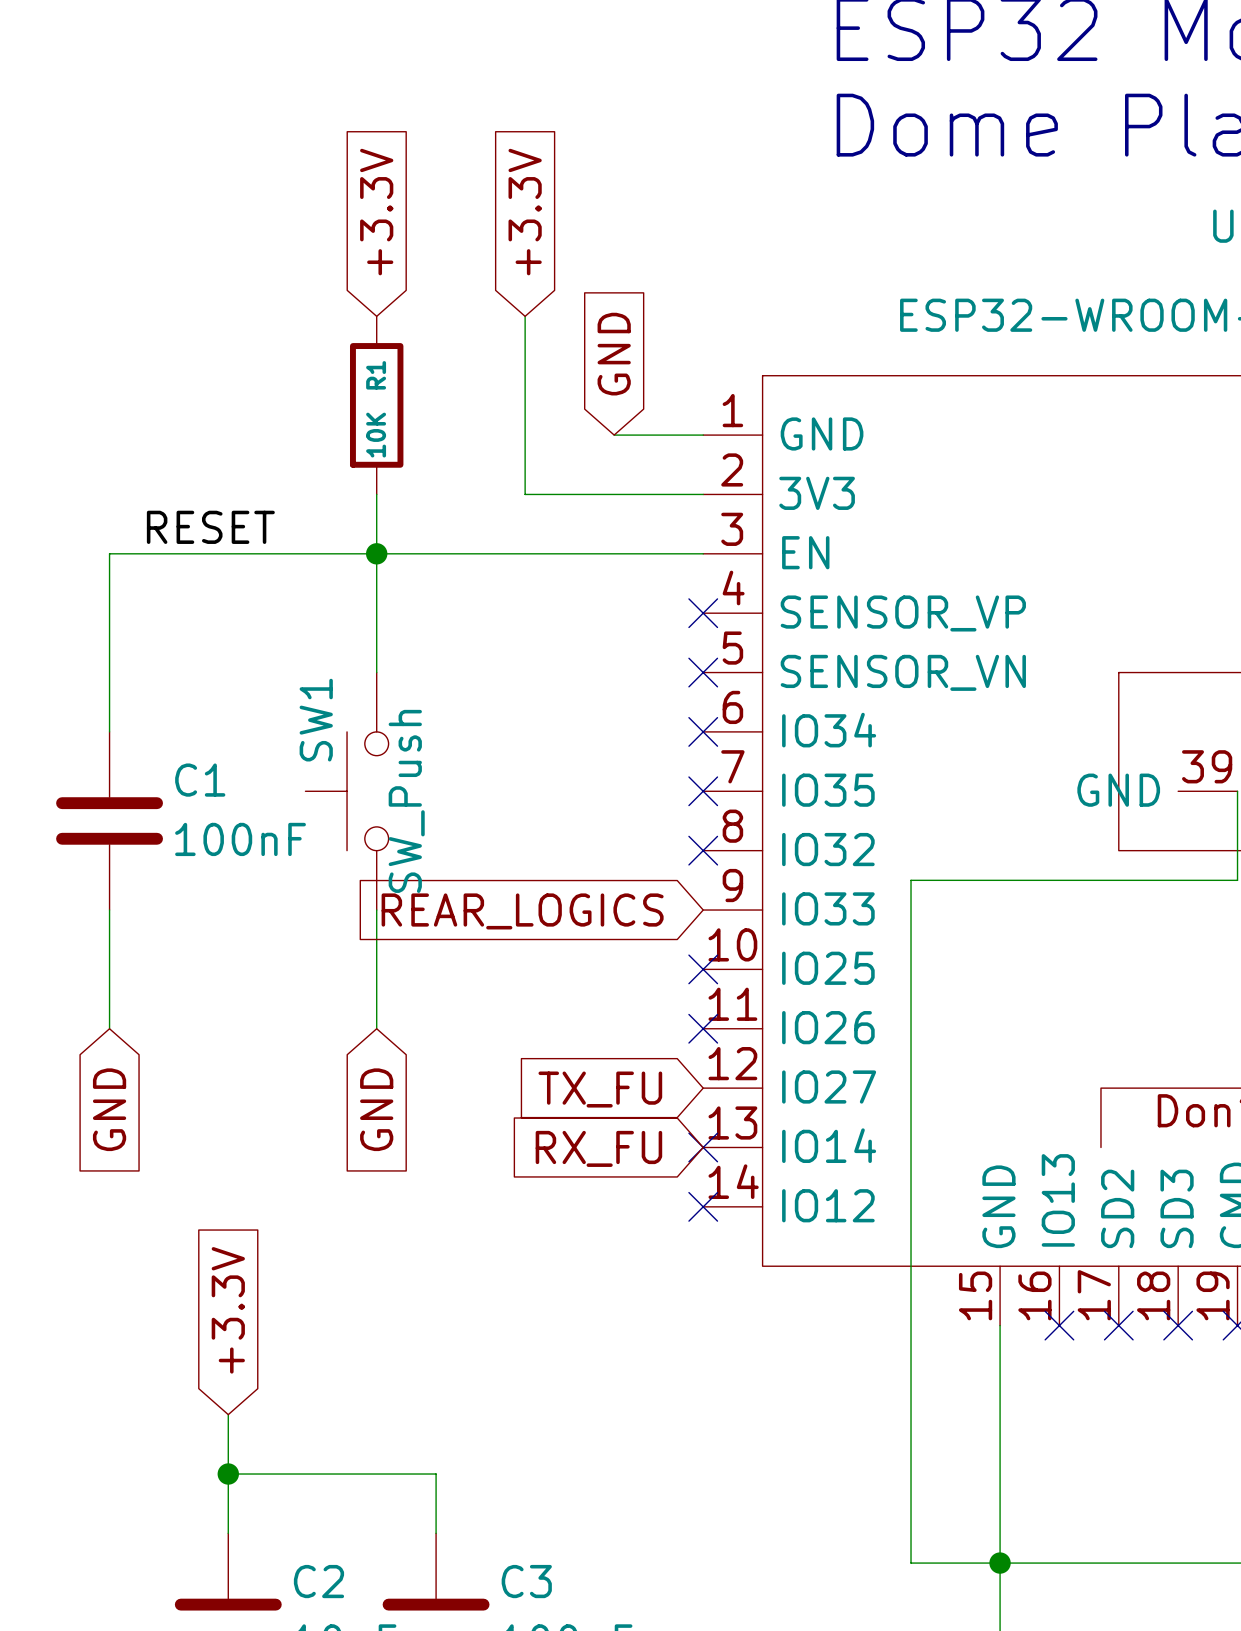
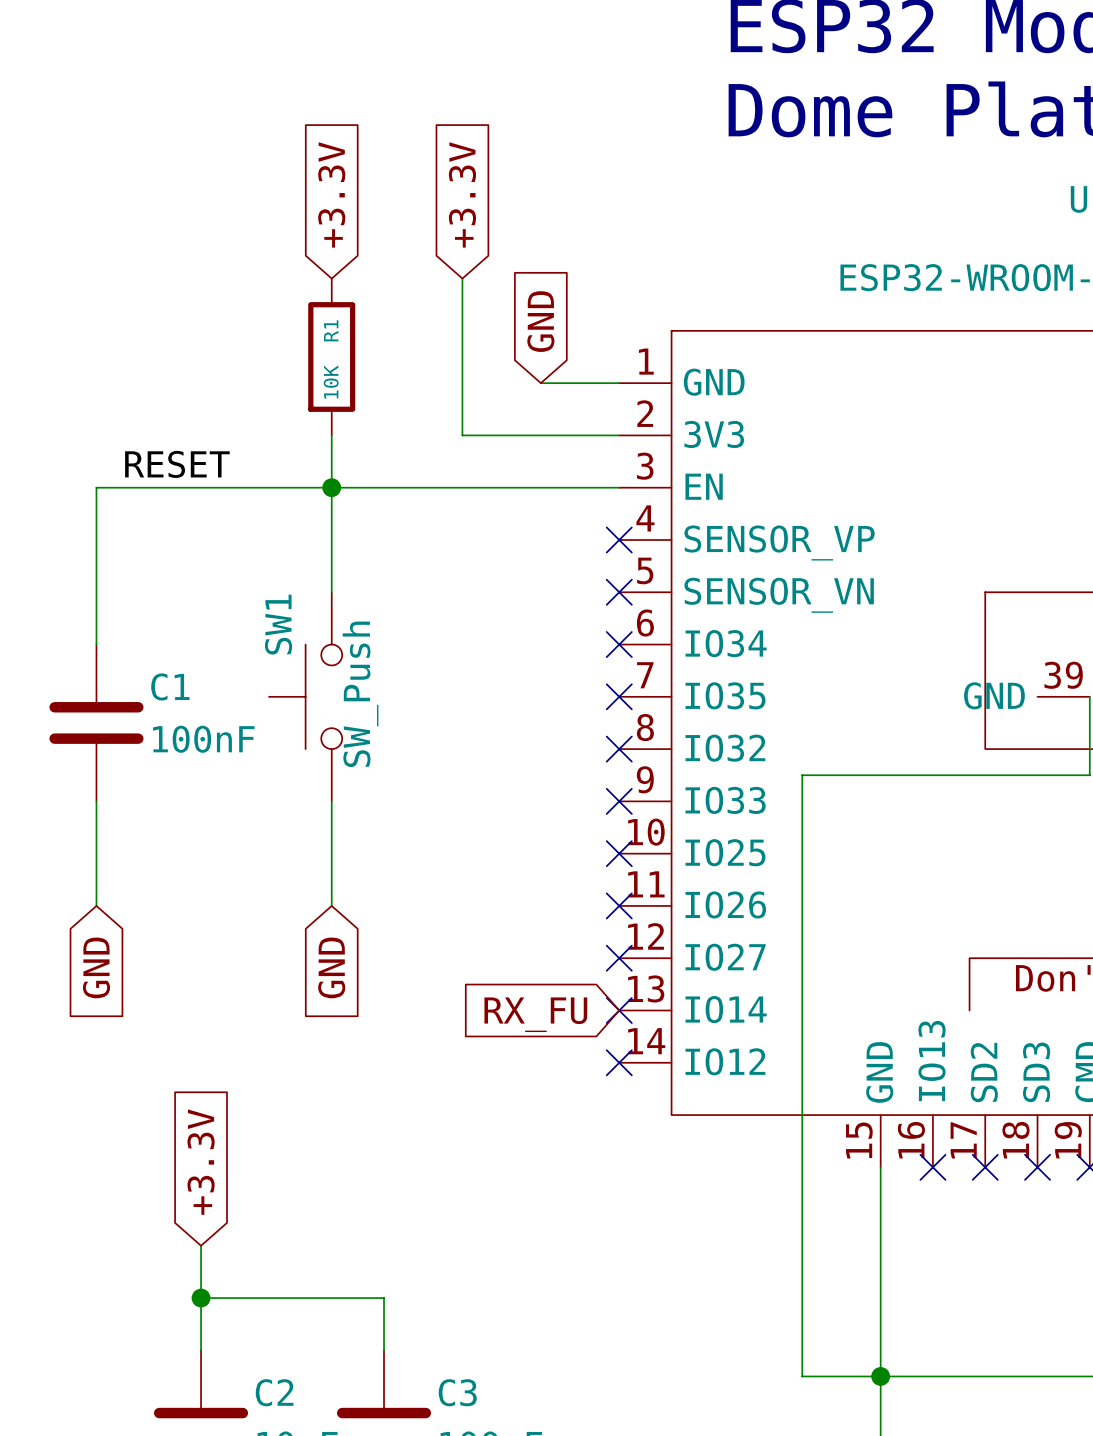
no-connect mark: none -> (619, 801)
global label: REAR_LOGICS (522, 911) -> none
no-connect mark: none -> (619, 958)
global label: TX_FU (600, 1089) -> none

